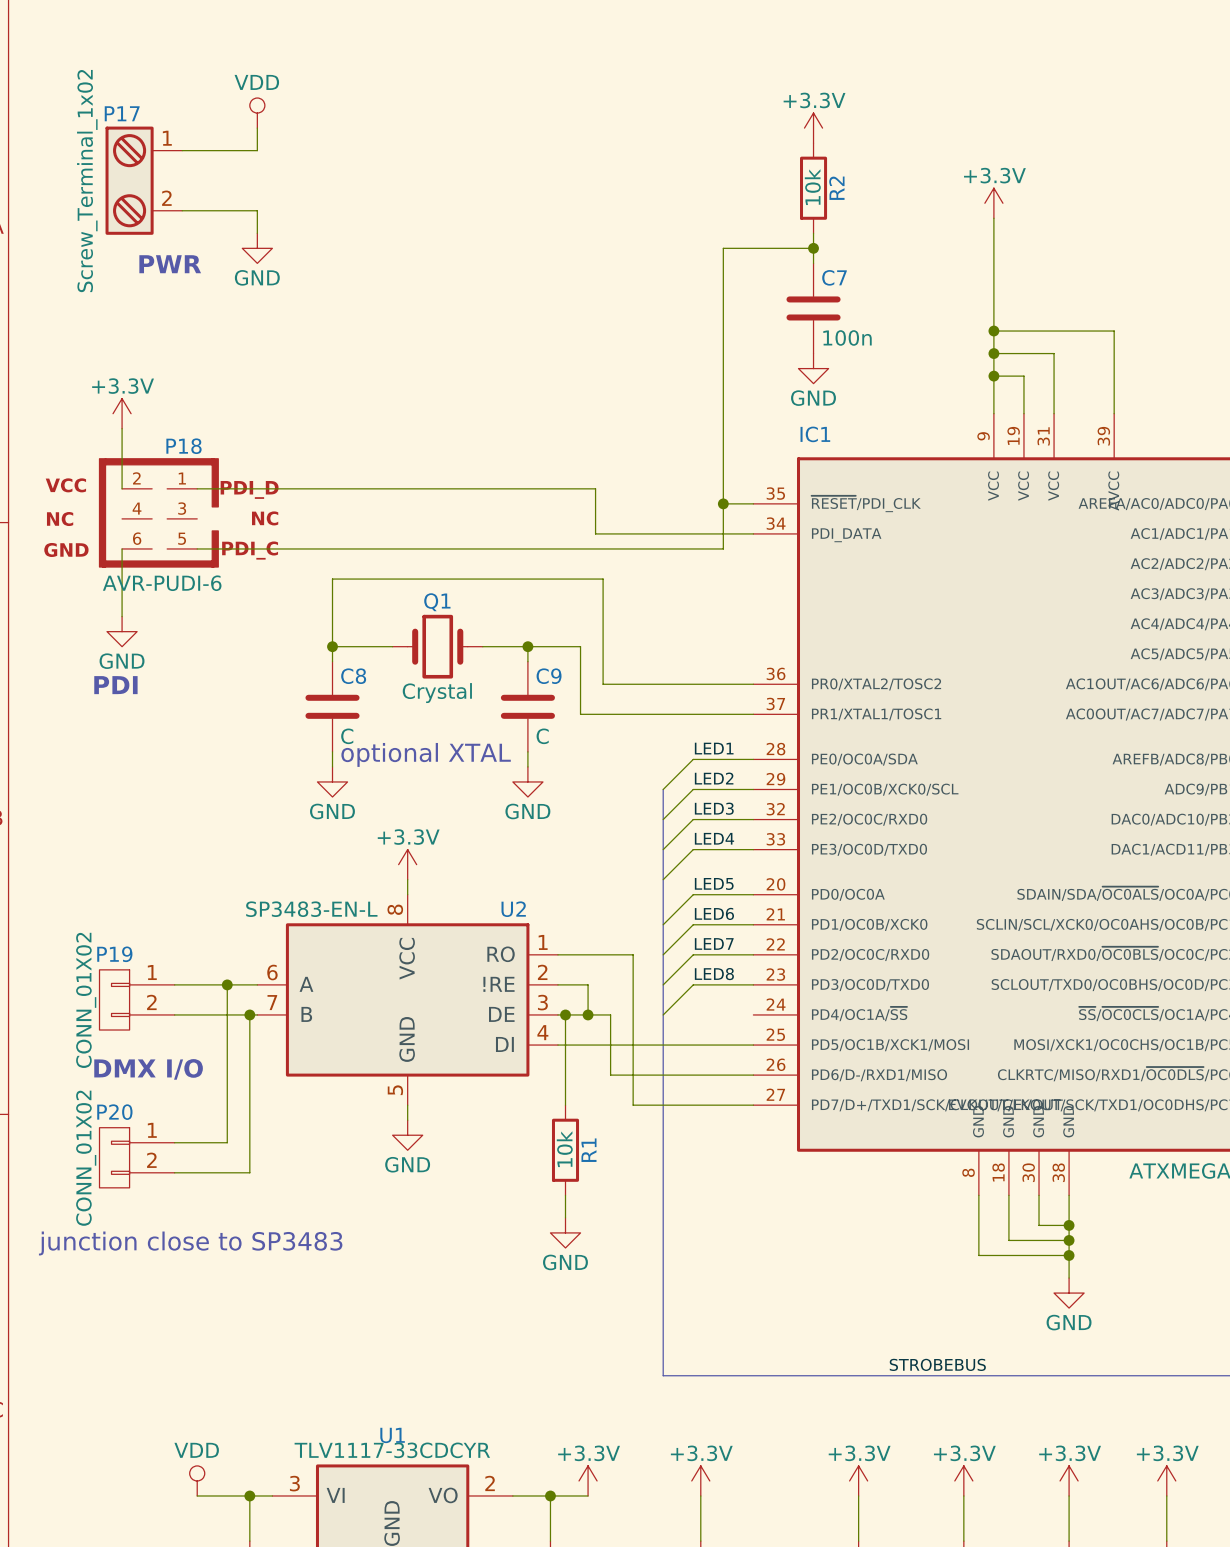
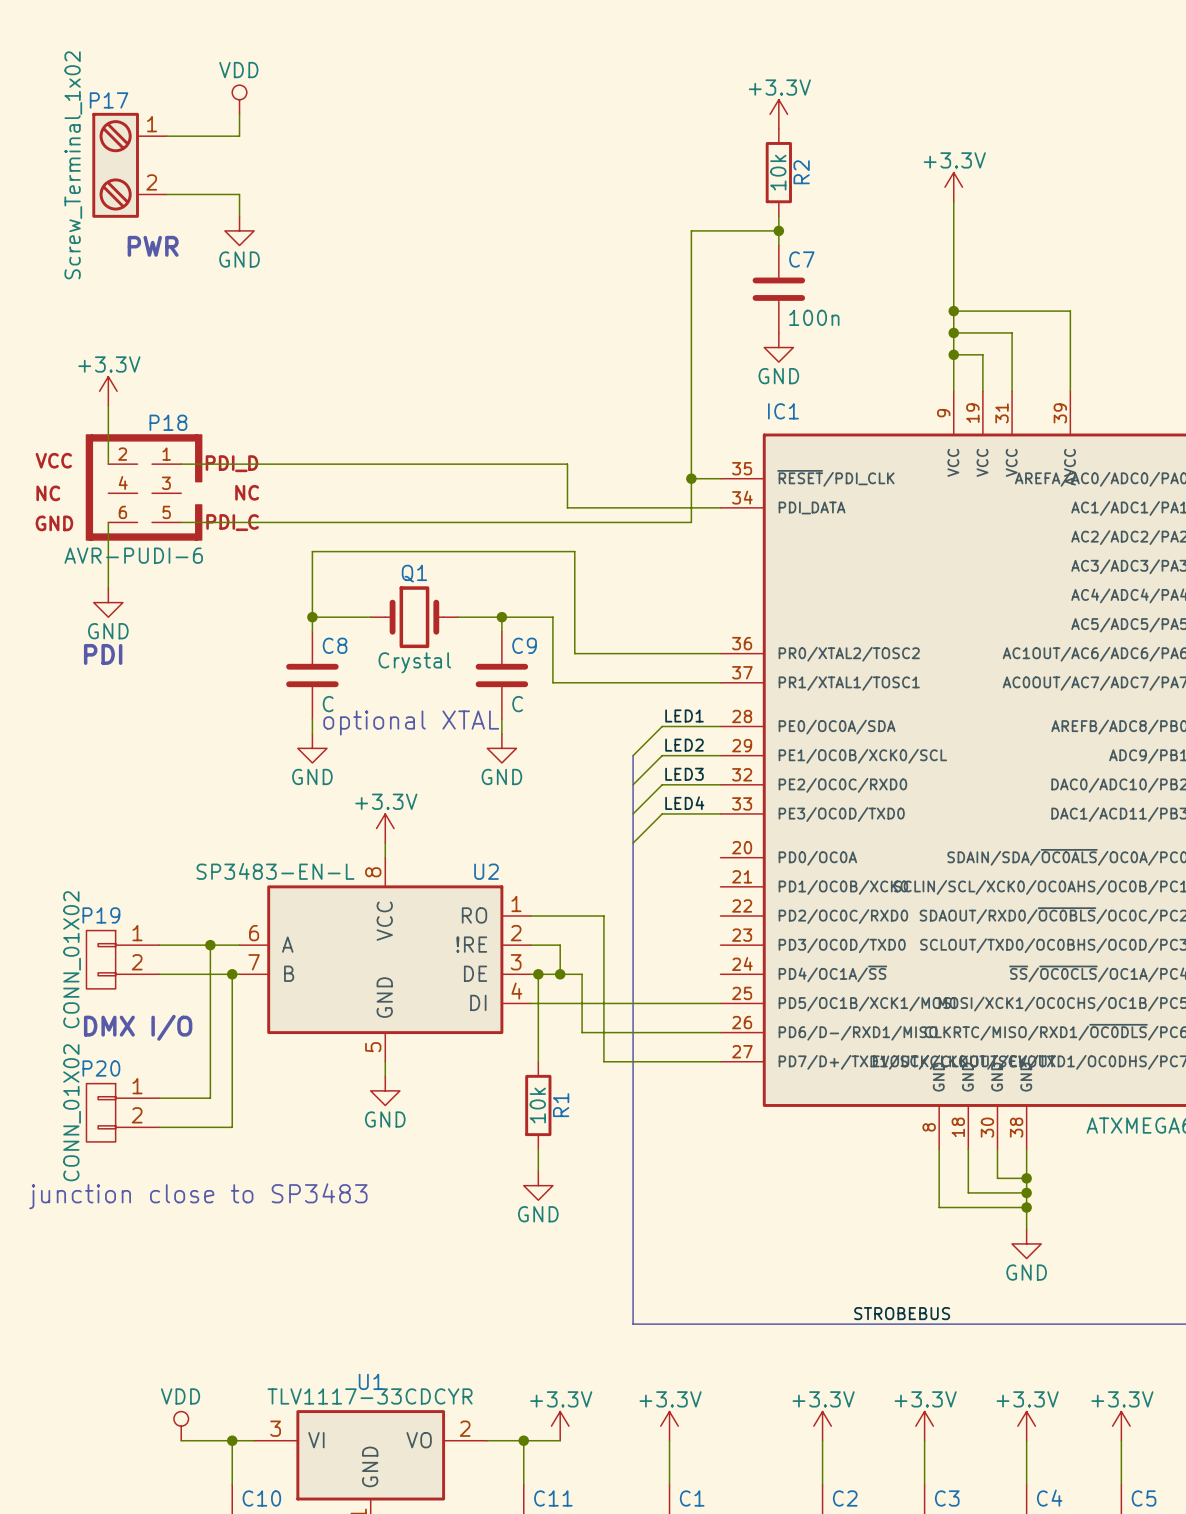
label: LED5 (714, 883) -> none
wire: (753, 894) (693, 894) (663, 924) -> none
label: LED6 (714, 913) -> none
wire: (753, 924) (693, 924) (663, 954) -> none
label: LED7 (714, 943) -> none
wire: (753, 954) (693, 954) (663, 984) -> none
label: LED8 (714, 974) -> none
wire: (753, 984) (693, 984) (663, 1014) -> none

